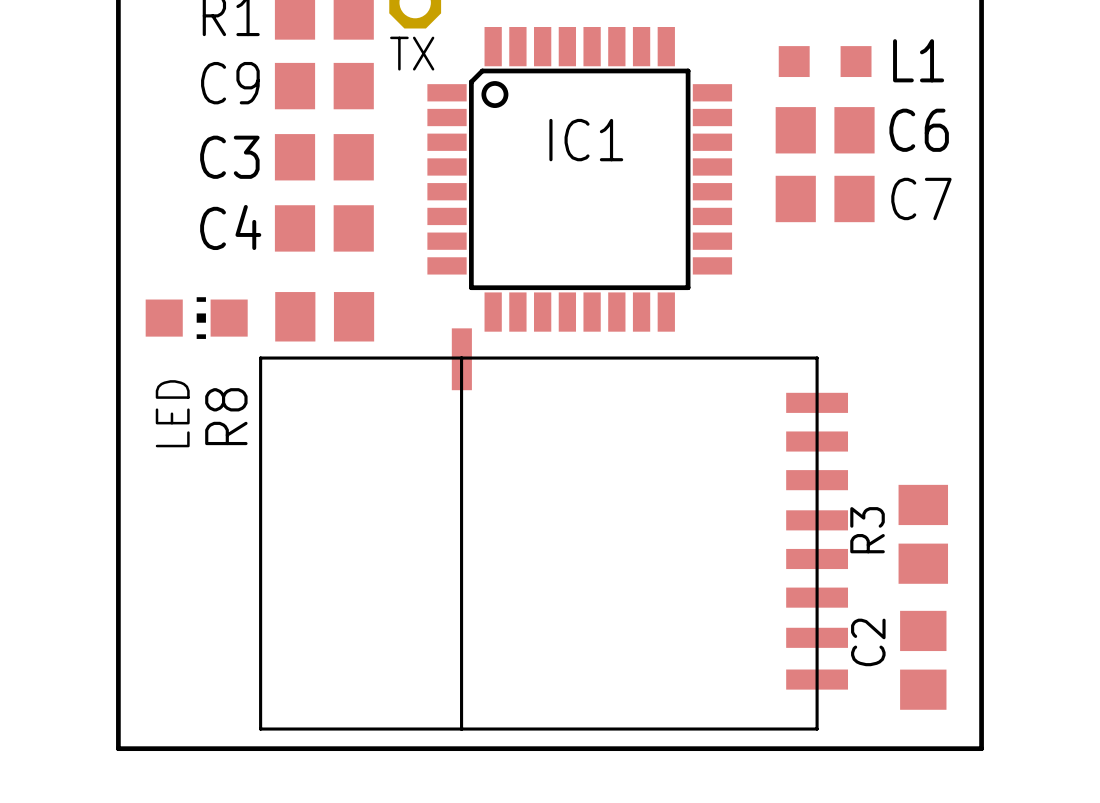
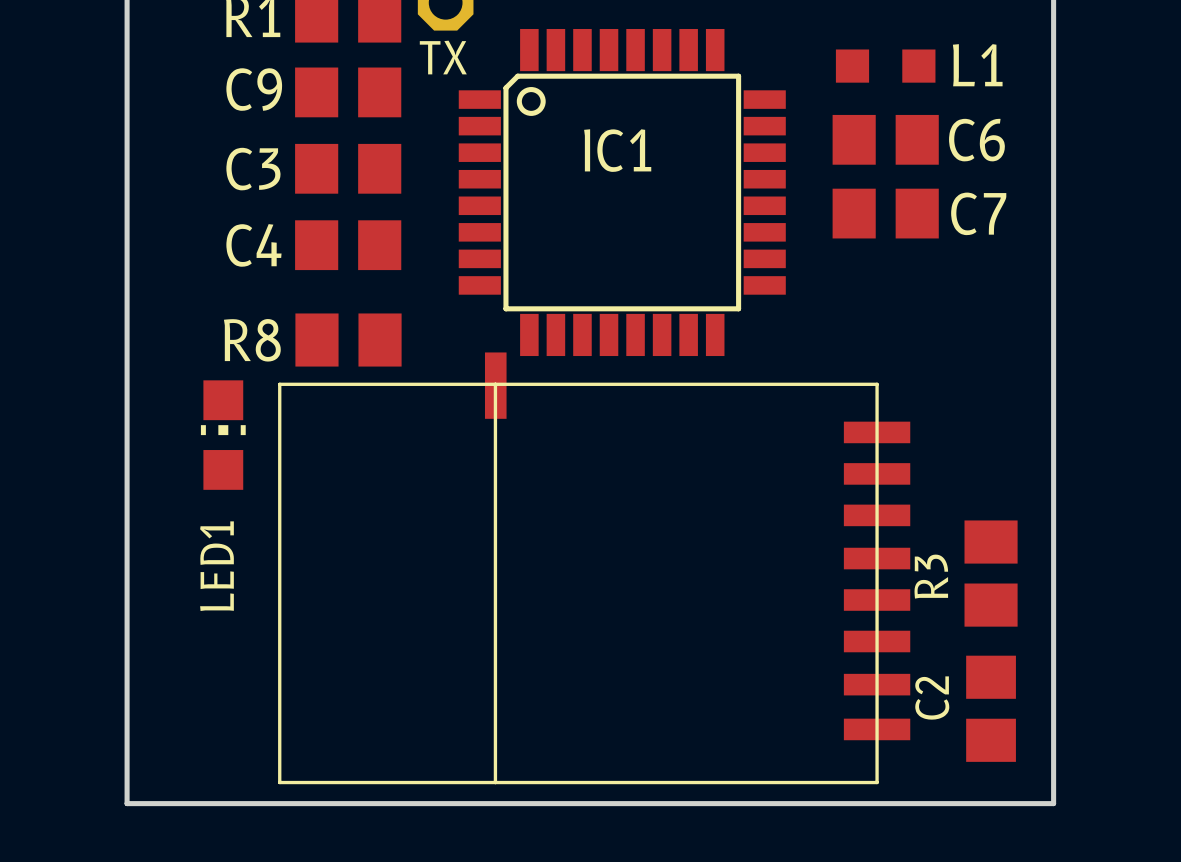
LED: (196, 318) -> none
LED1: none -> (223, 435)
R8 name rotation: 0° (226, 416) -> 90° clockwise (252, 340)
R8 name position: R8 (226, 416) -> R8 (252, 340)

